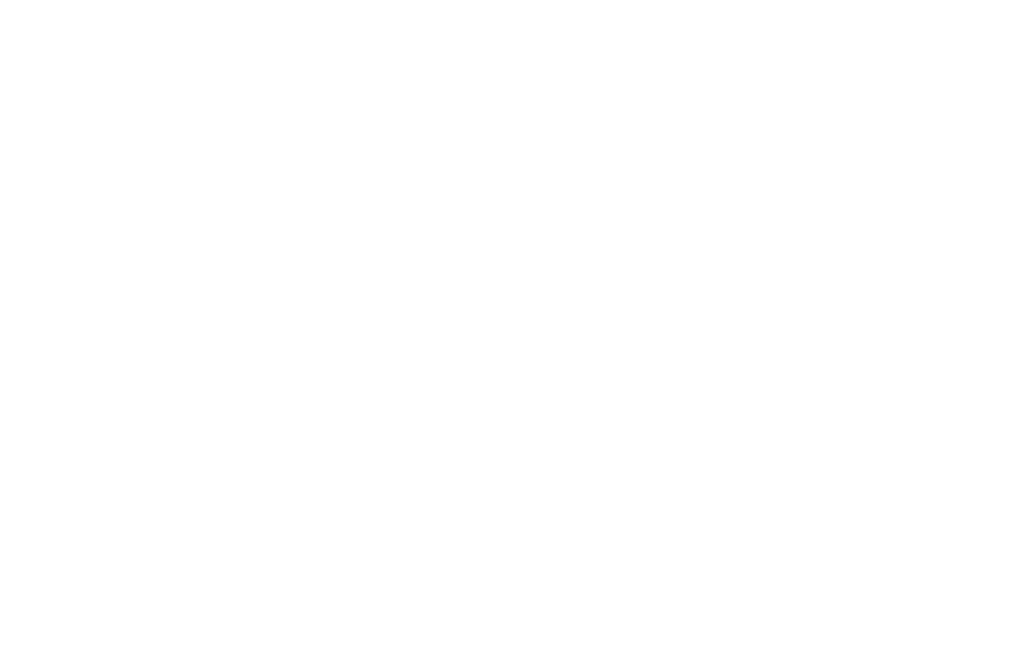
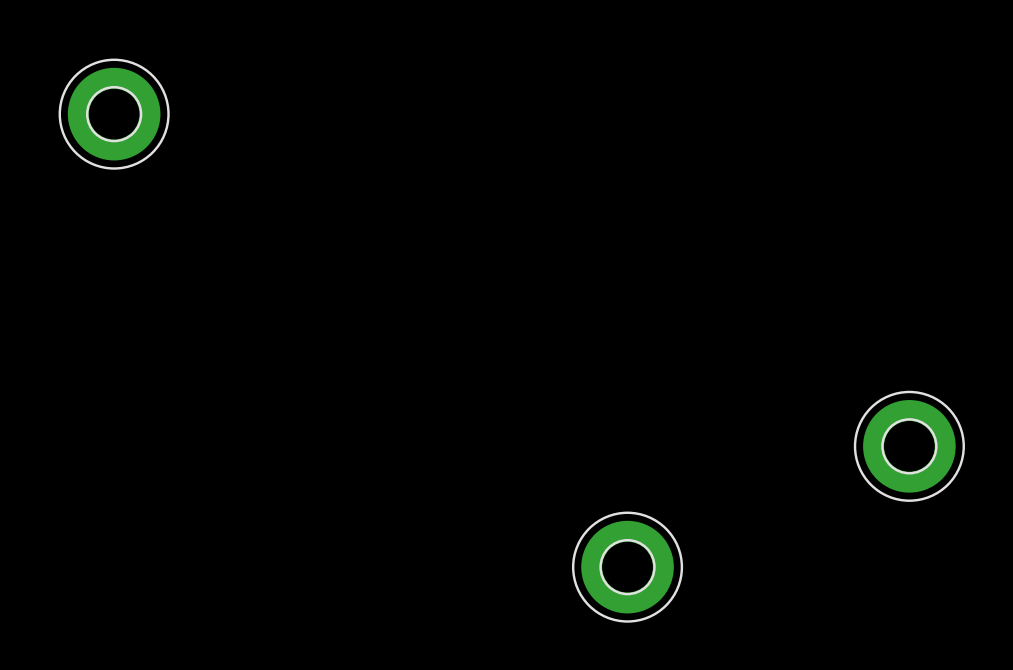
part: none -> (114, 114)
part: none -> (909, 446)
part: none -> (627, 567)

